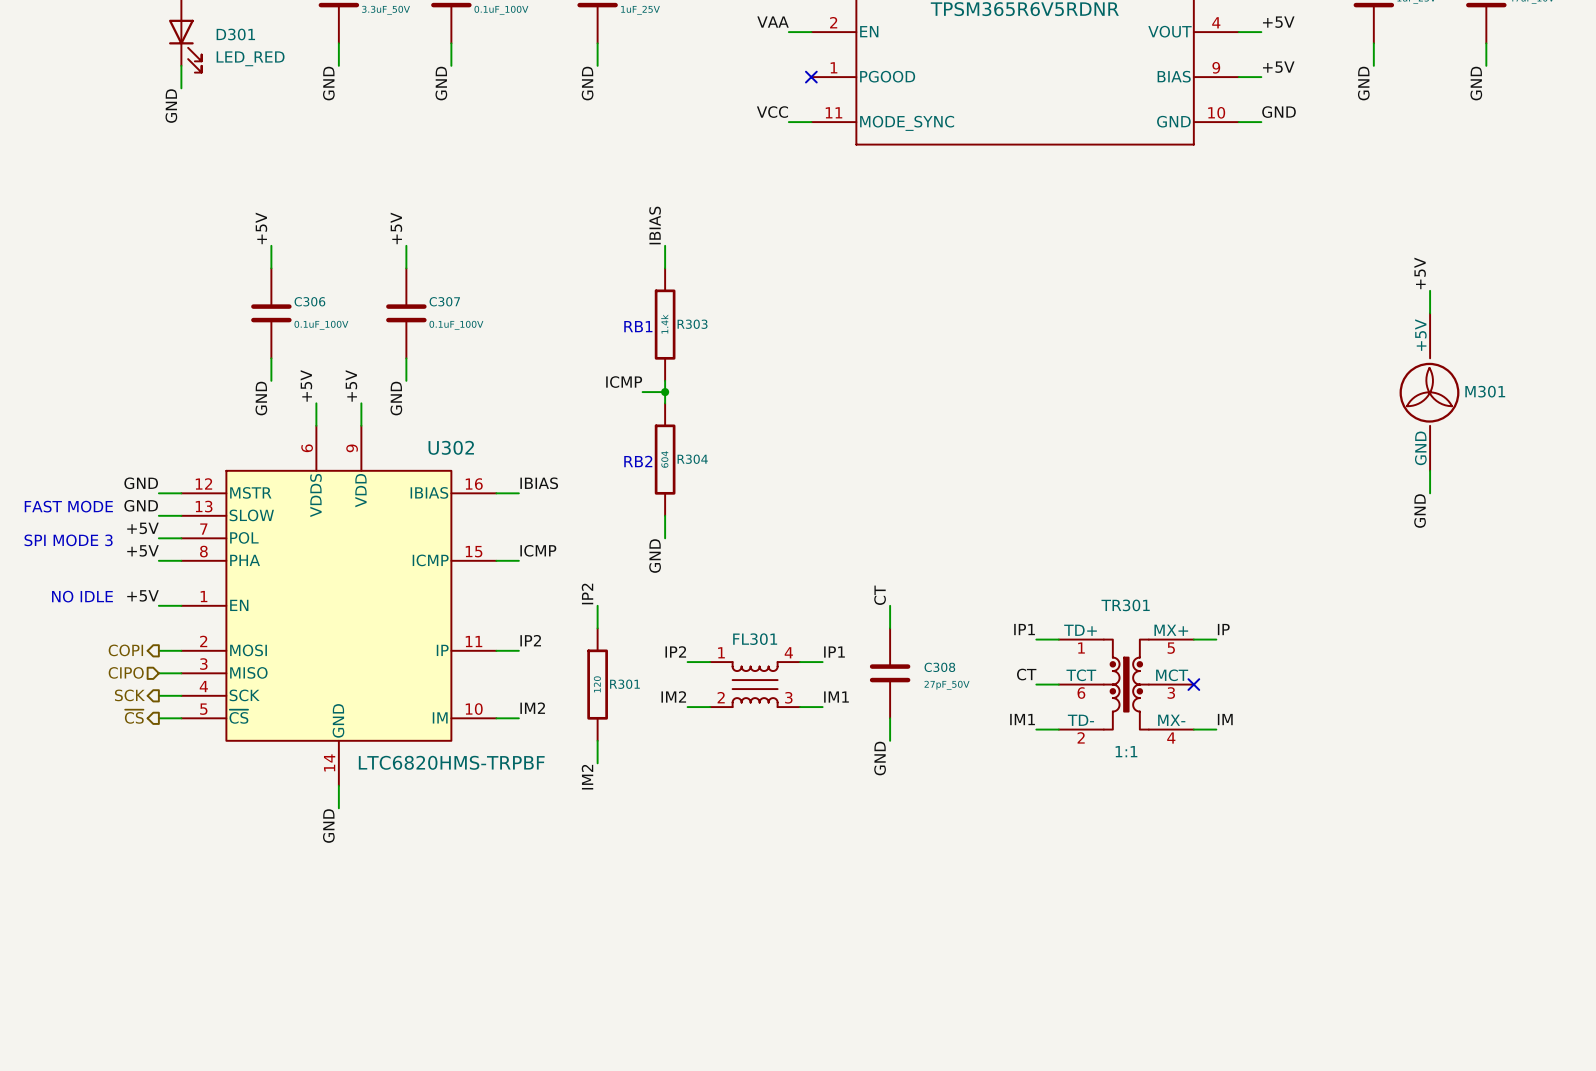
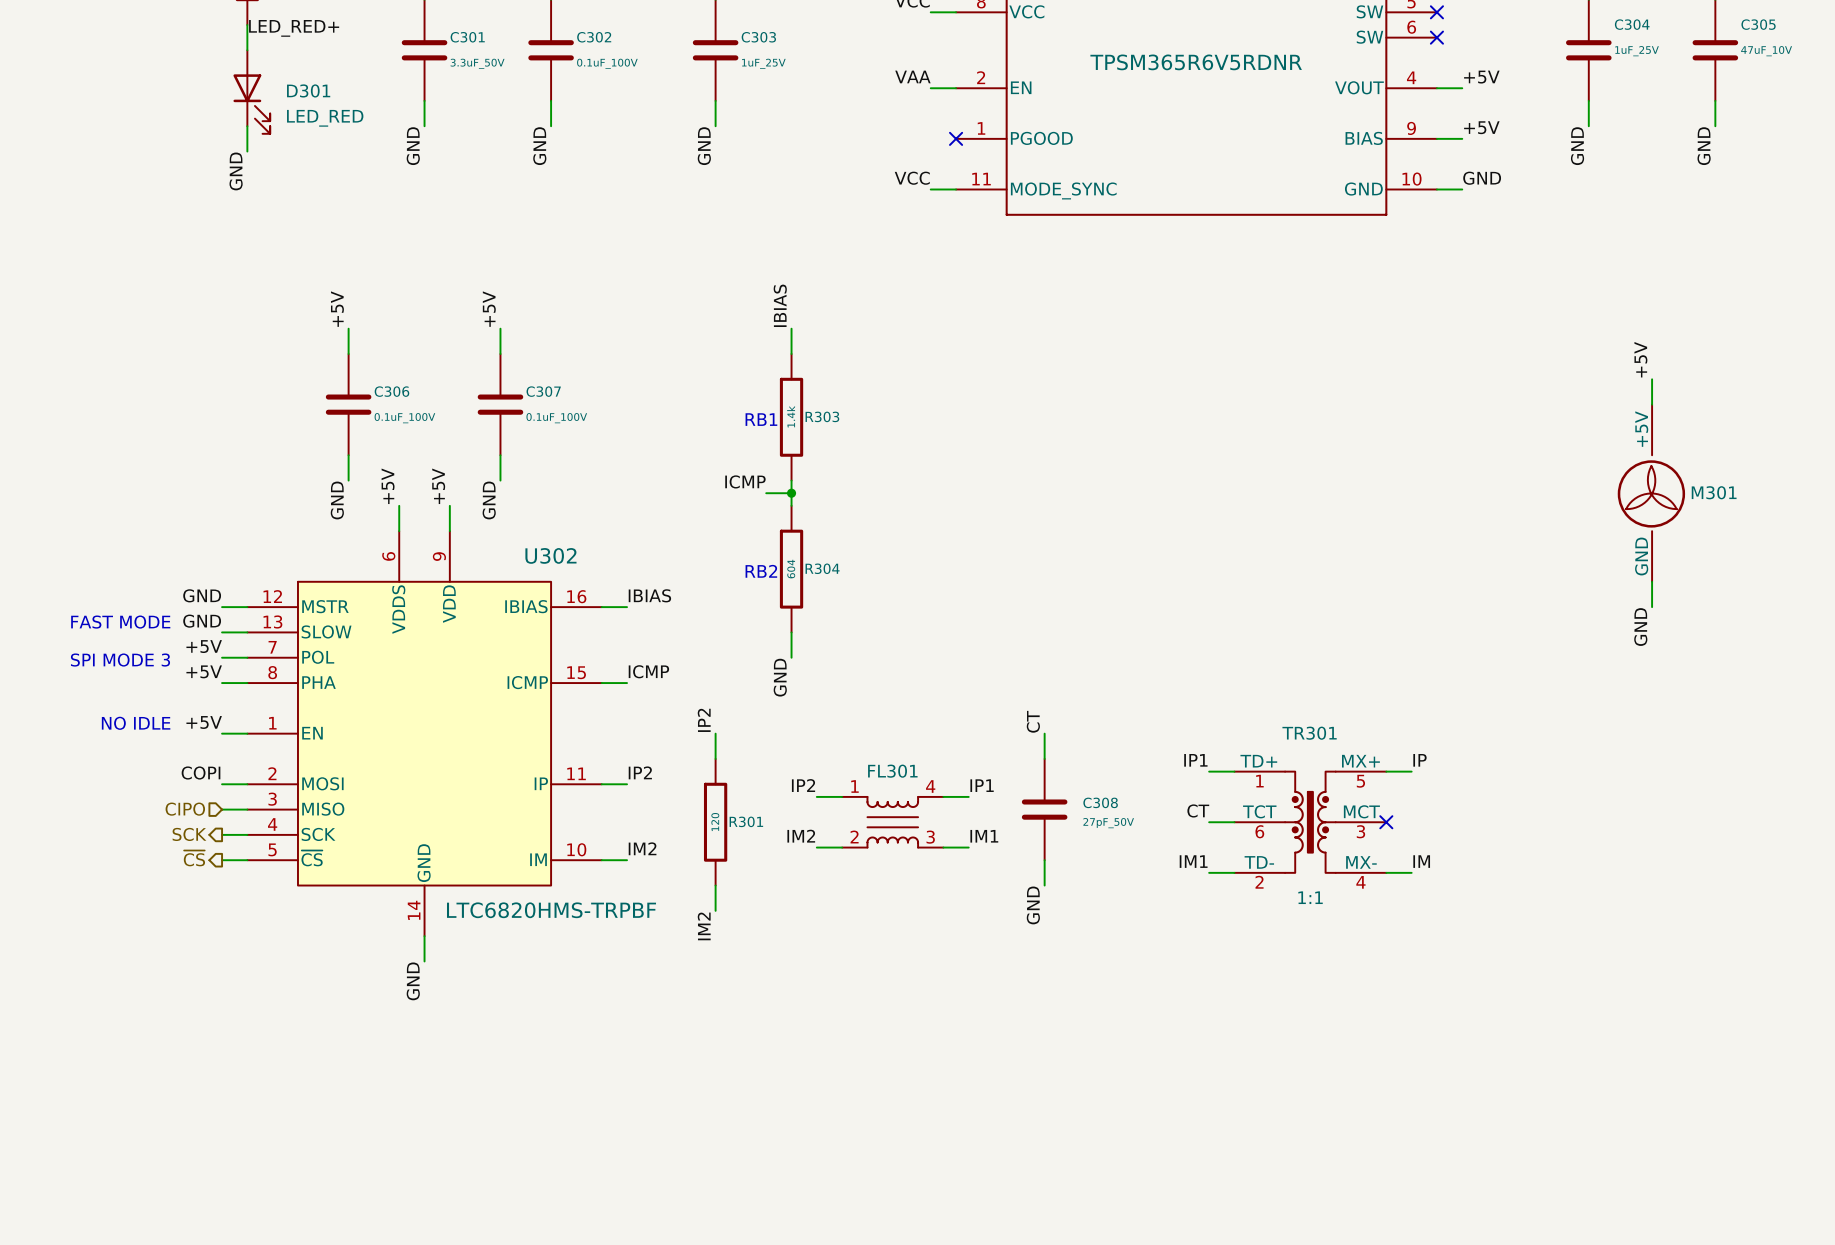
label: none -> COPI (201, 773)
hierarchical label: COPI (125, 650) -> none

